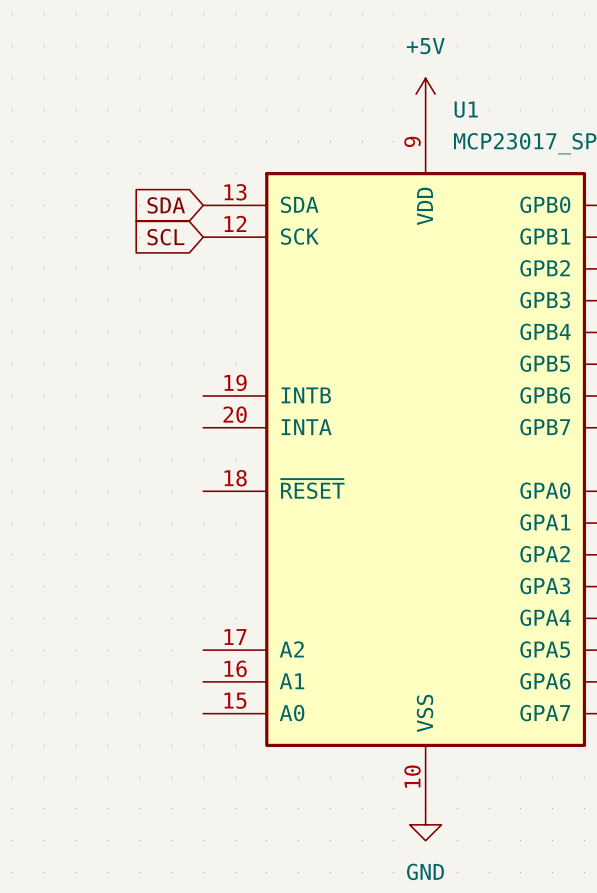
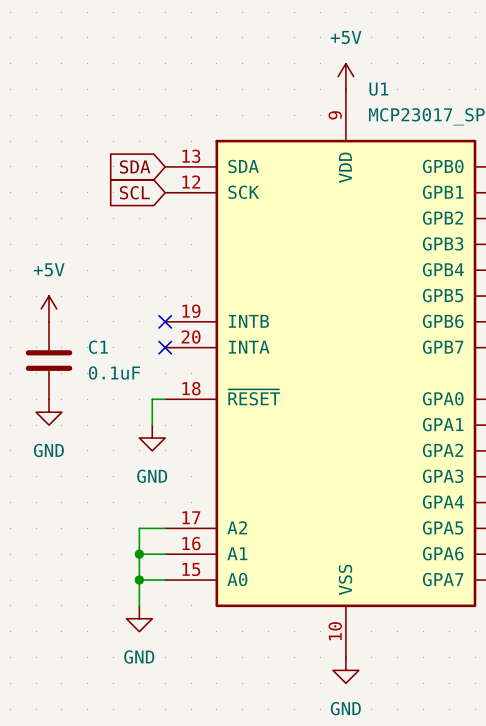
power symbol: none -> +5V (49, 308)
no-connect mark: none -> (165, 321)
no-connect mark: none -> (165, 347)
C1: none -> 0.1uF (49, 360)
wire: none -> (165, 399) (152, 399) (152, 425)
power symbol: none -> GND (49, 412)
power symbol: none -> GND (152, 438)
wire: none -> (165, 528) (139, 528) (139, 605)
wire: none -> (139, 554) (165, 554)
junction: none -> (139, 554)
wire: none -> (139, 580) (165, 580)
junction: none -> (139, 580)
power symbol: none -> GND (139, 618)

